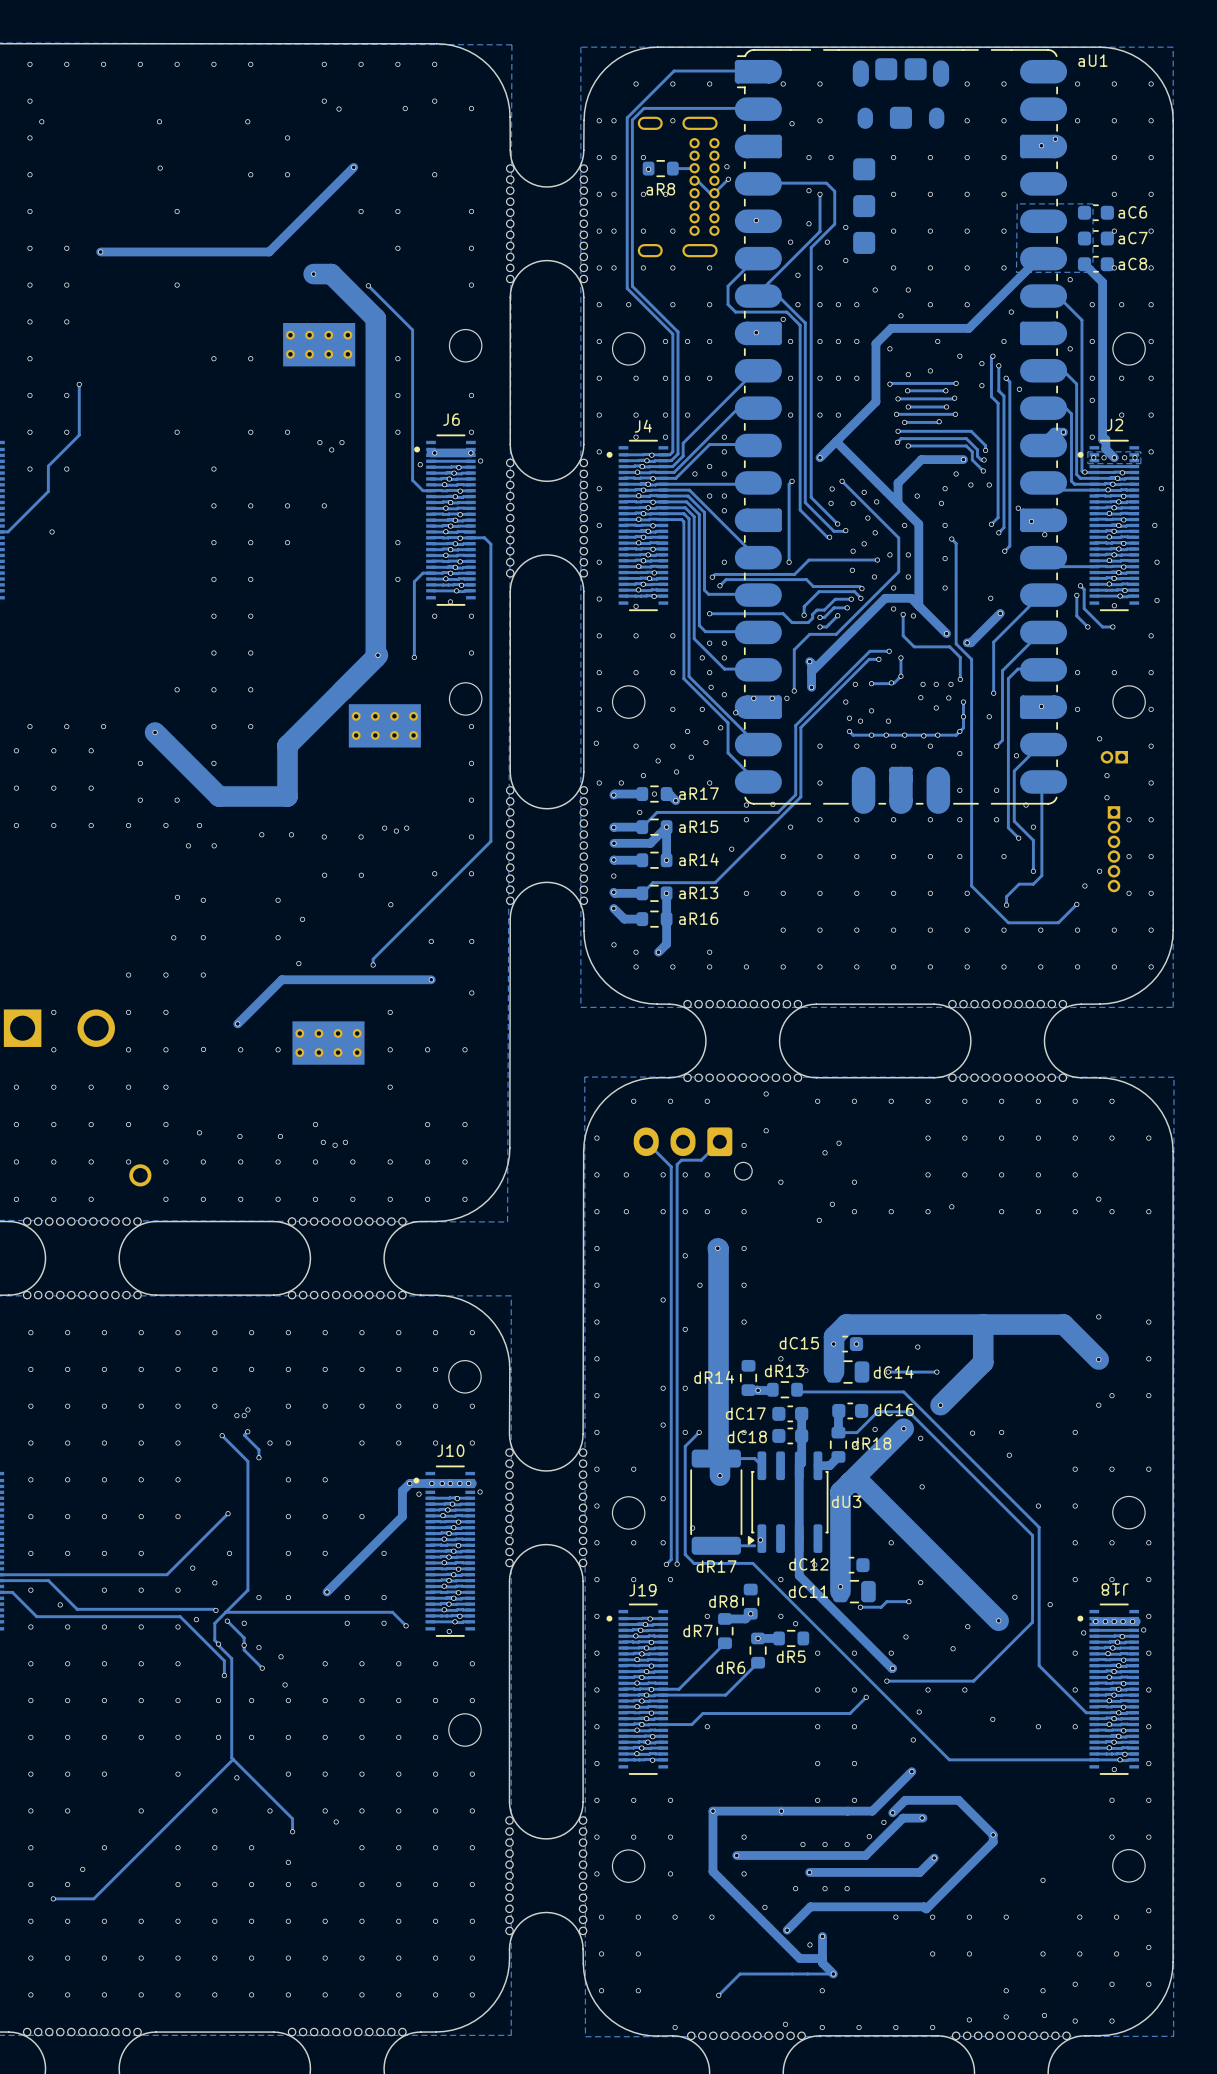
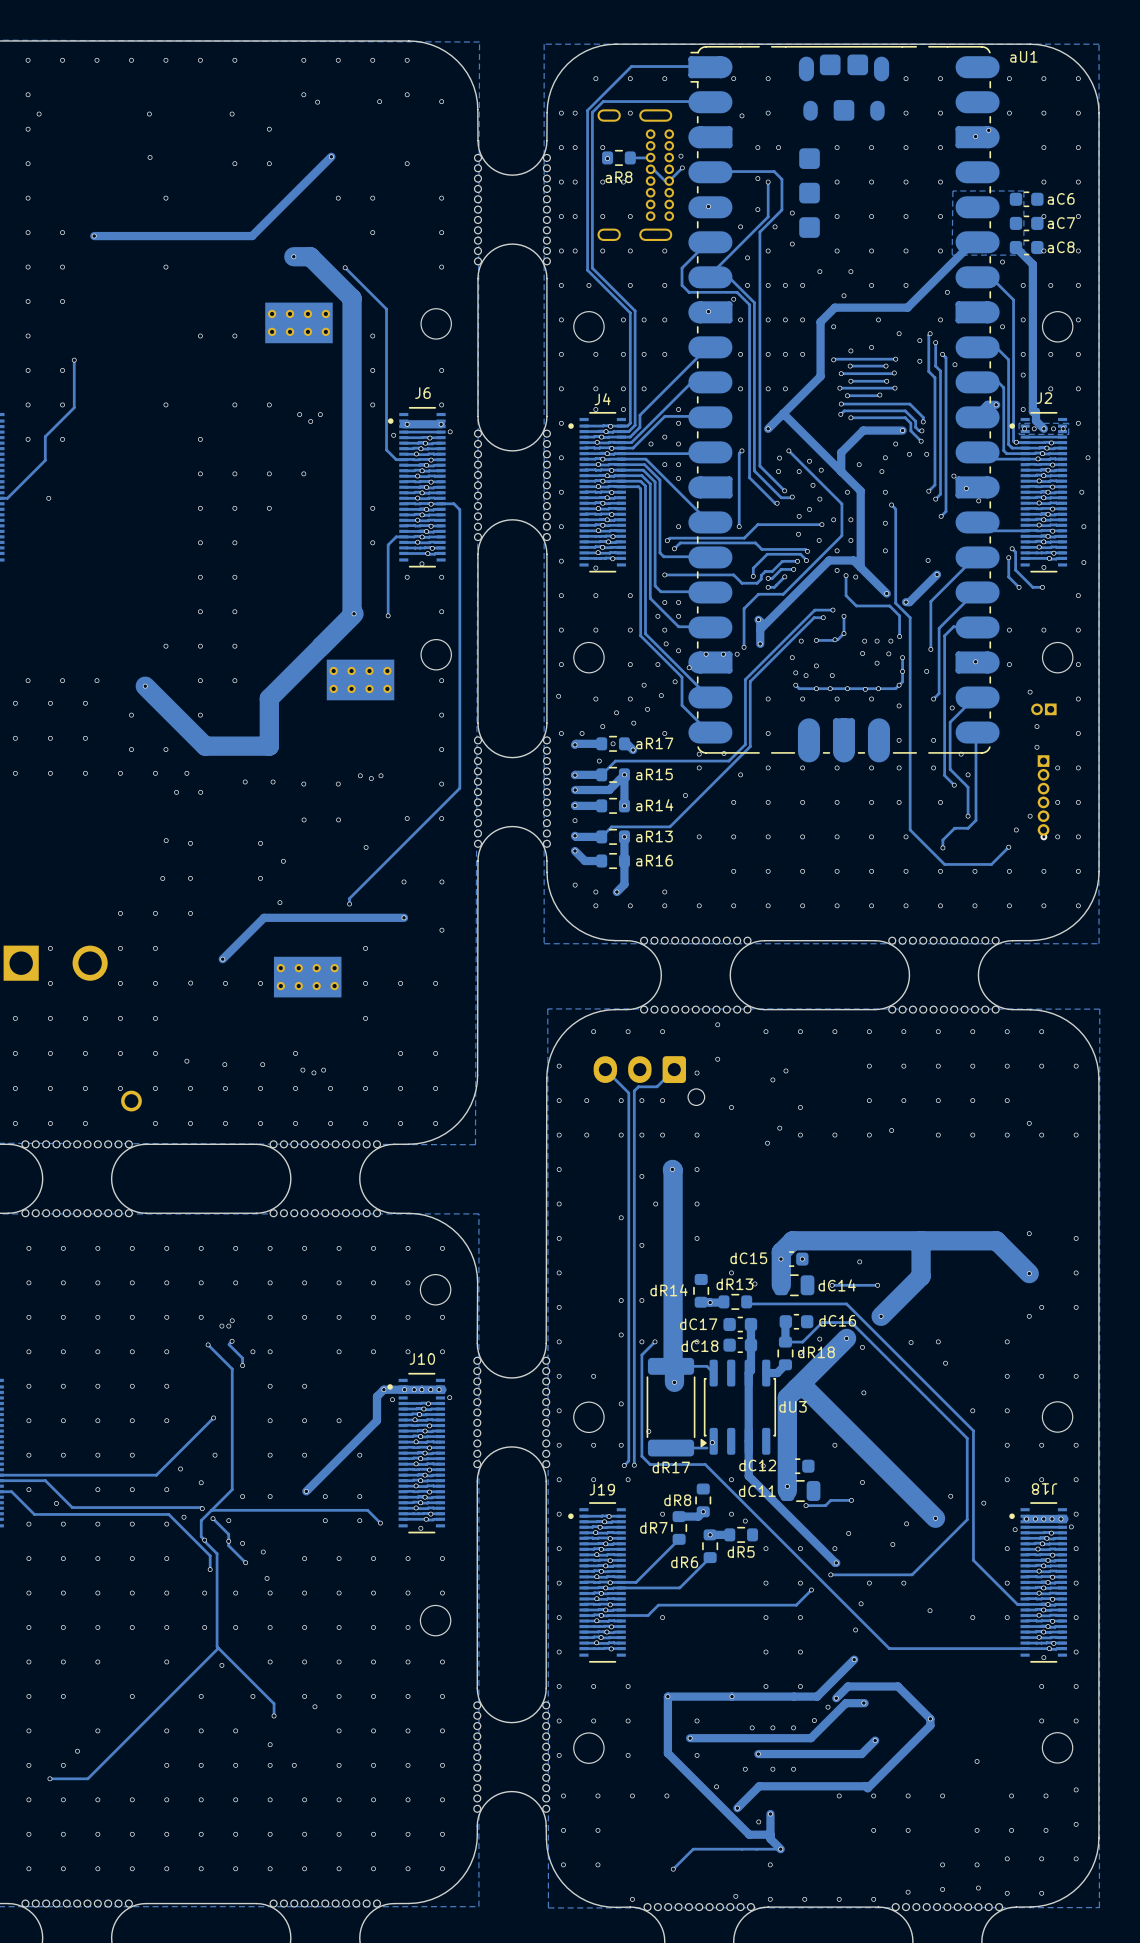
via: none -> (1043, 836)

